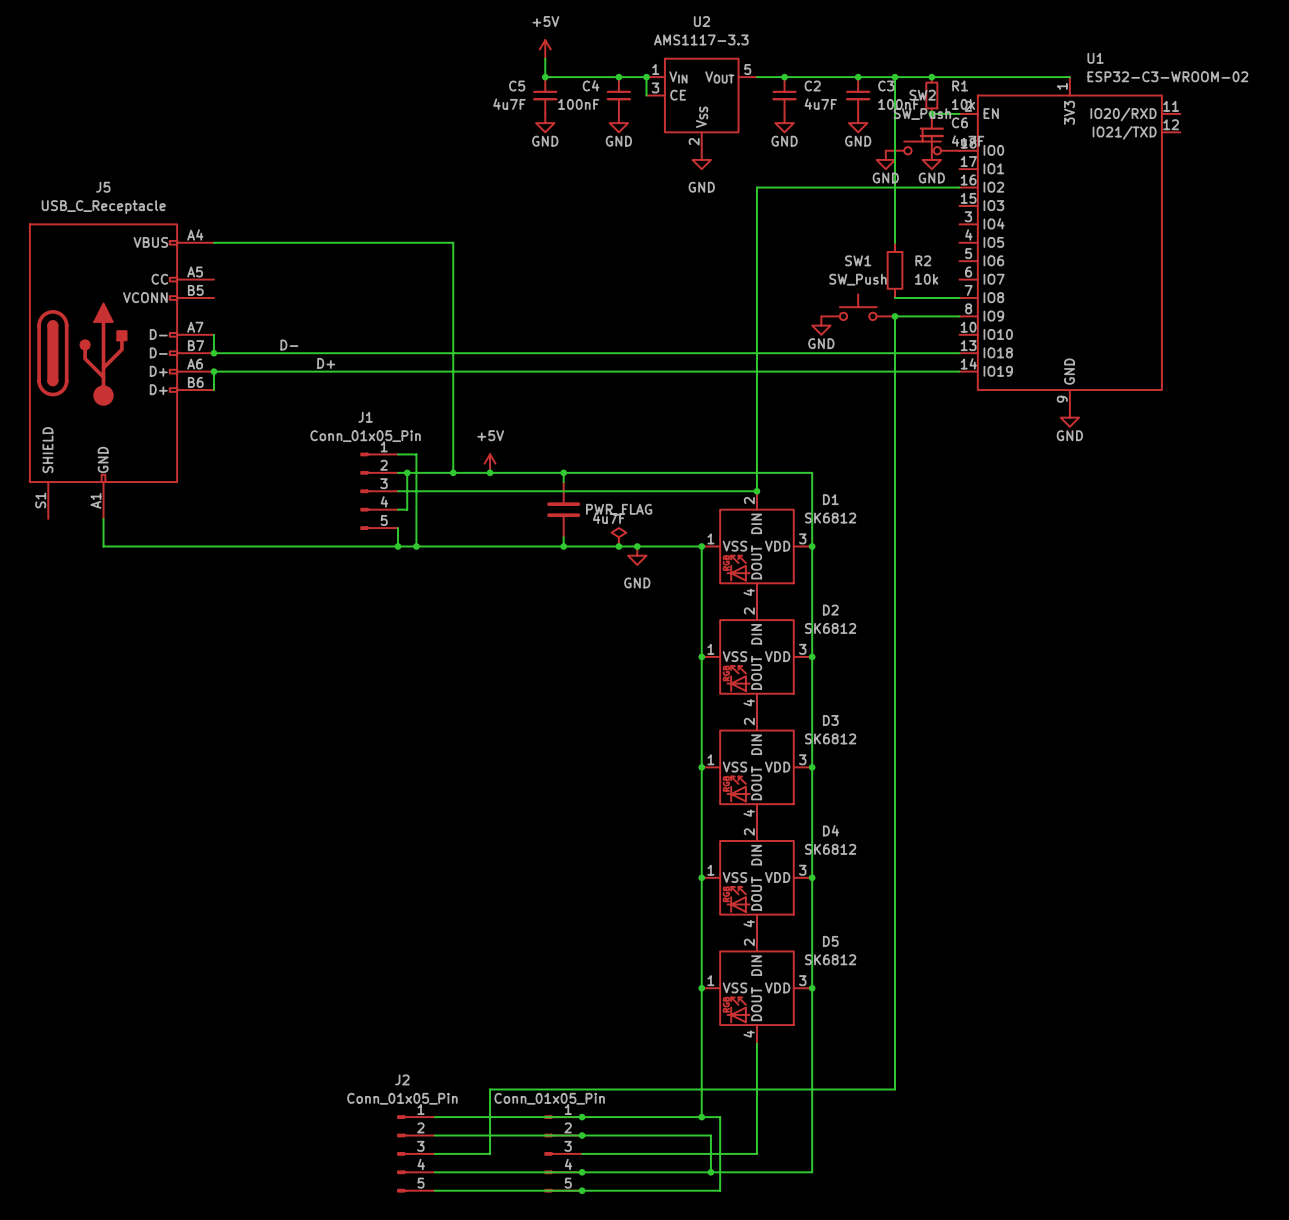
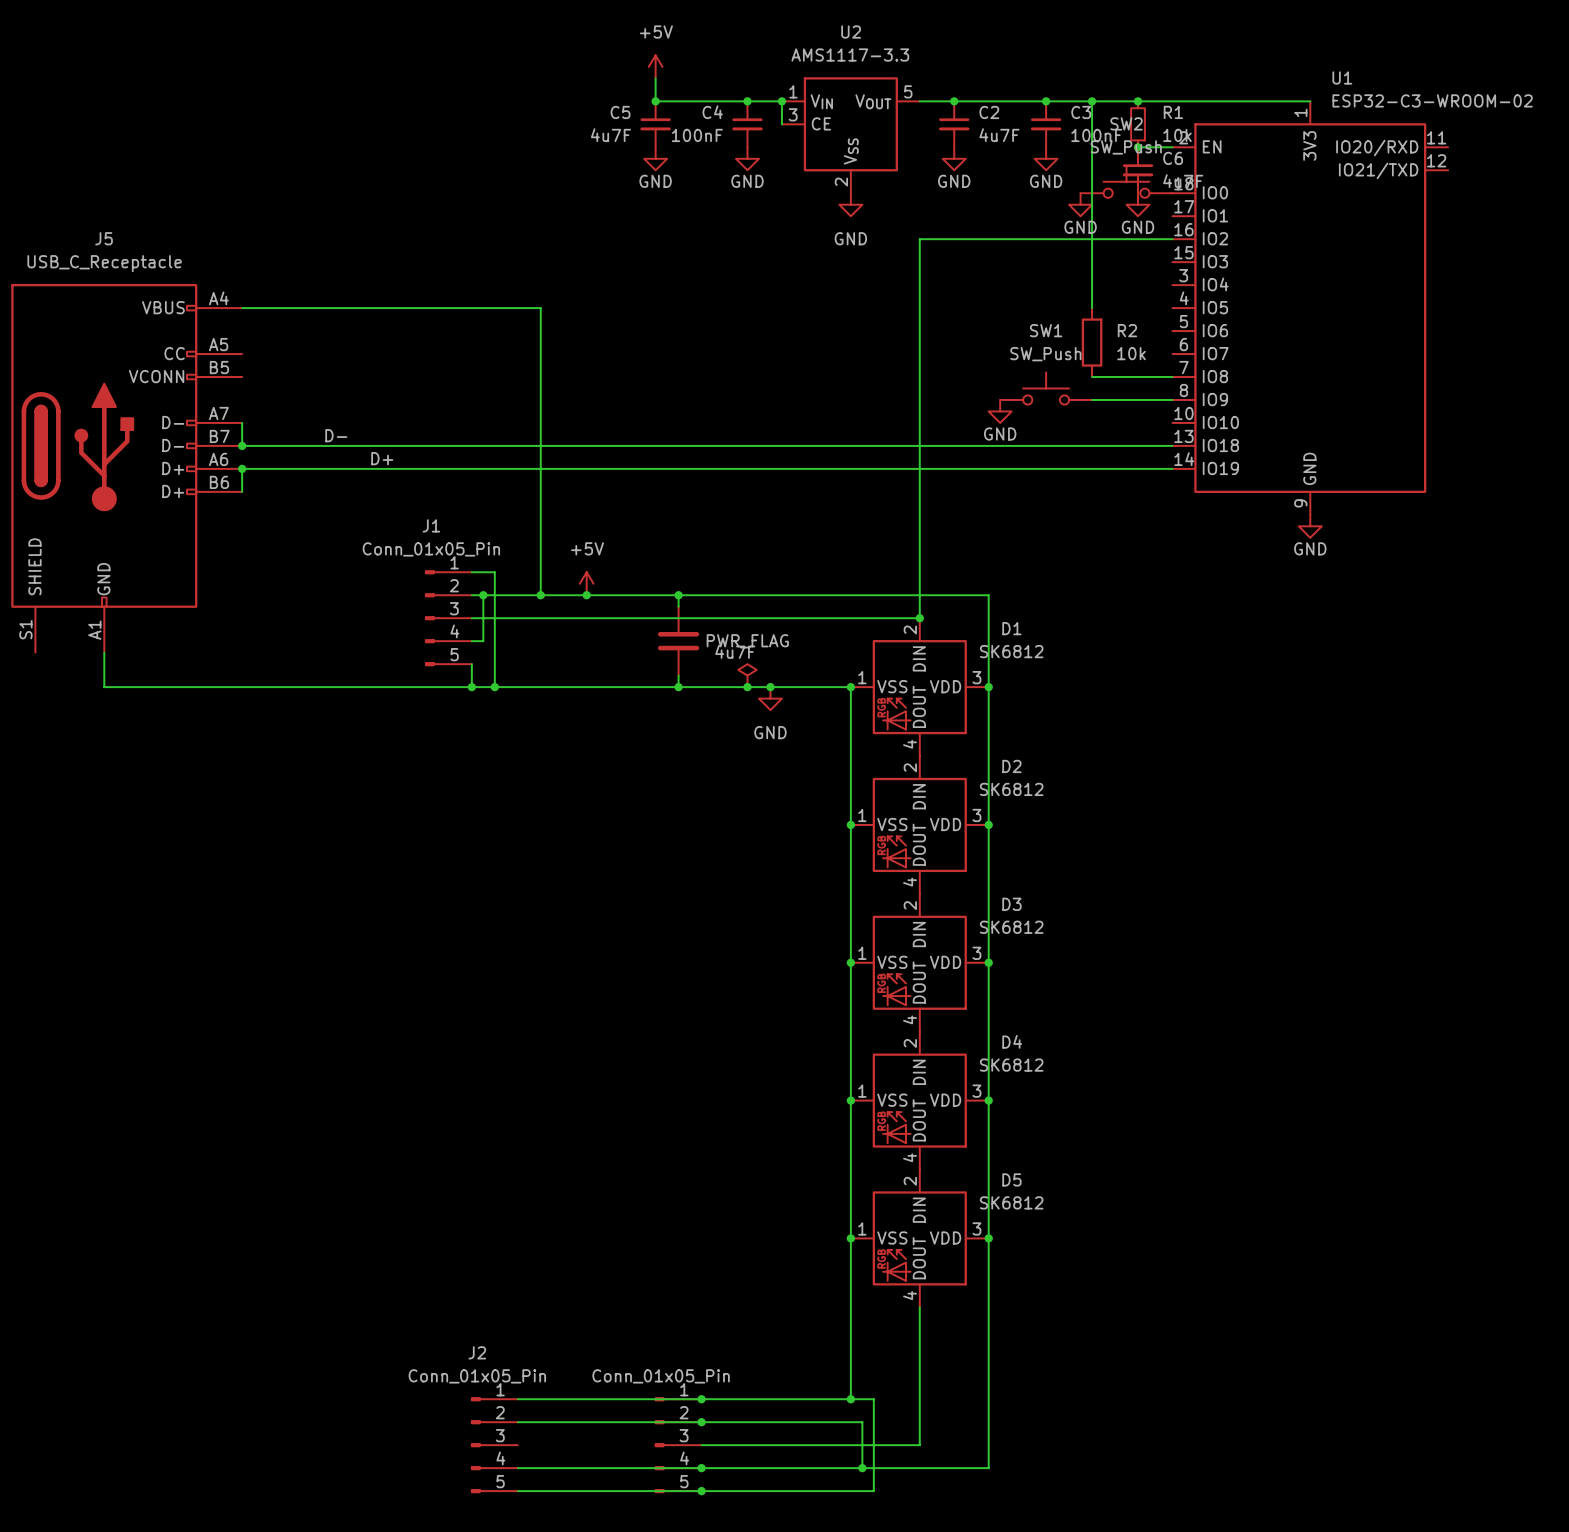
wire: (895, 316) (895, 1089) (490, 1089) (490, 1153) (434, 1153) -> none
junction: (895, 316) -> none

